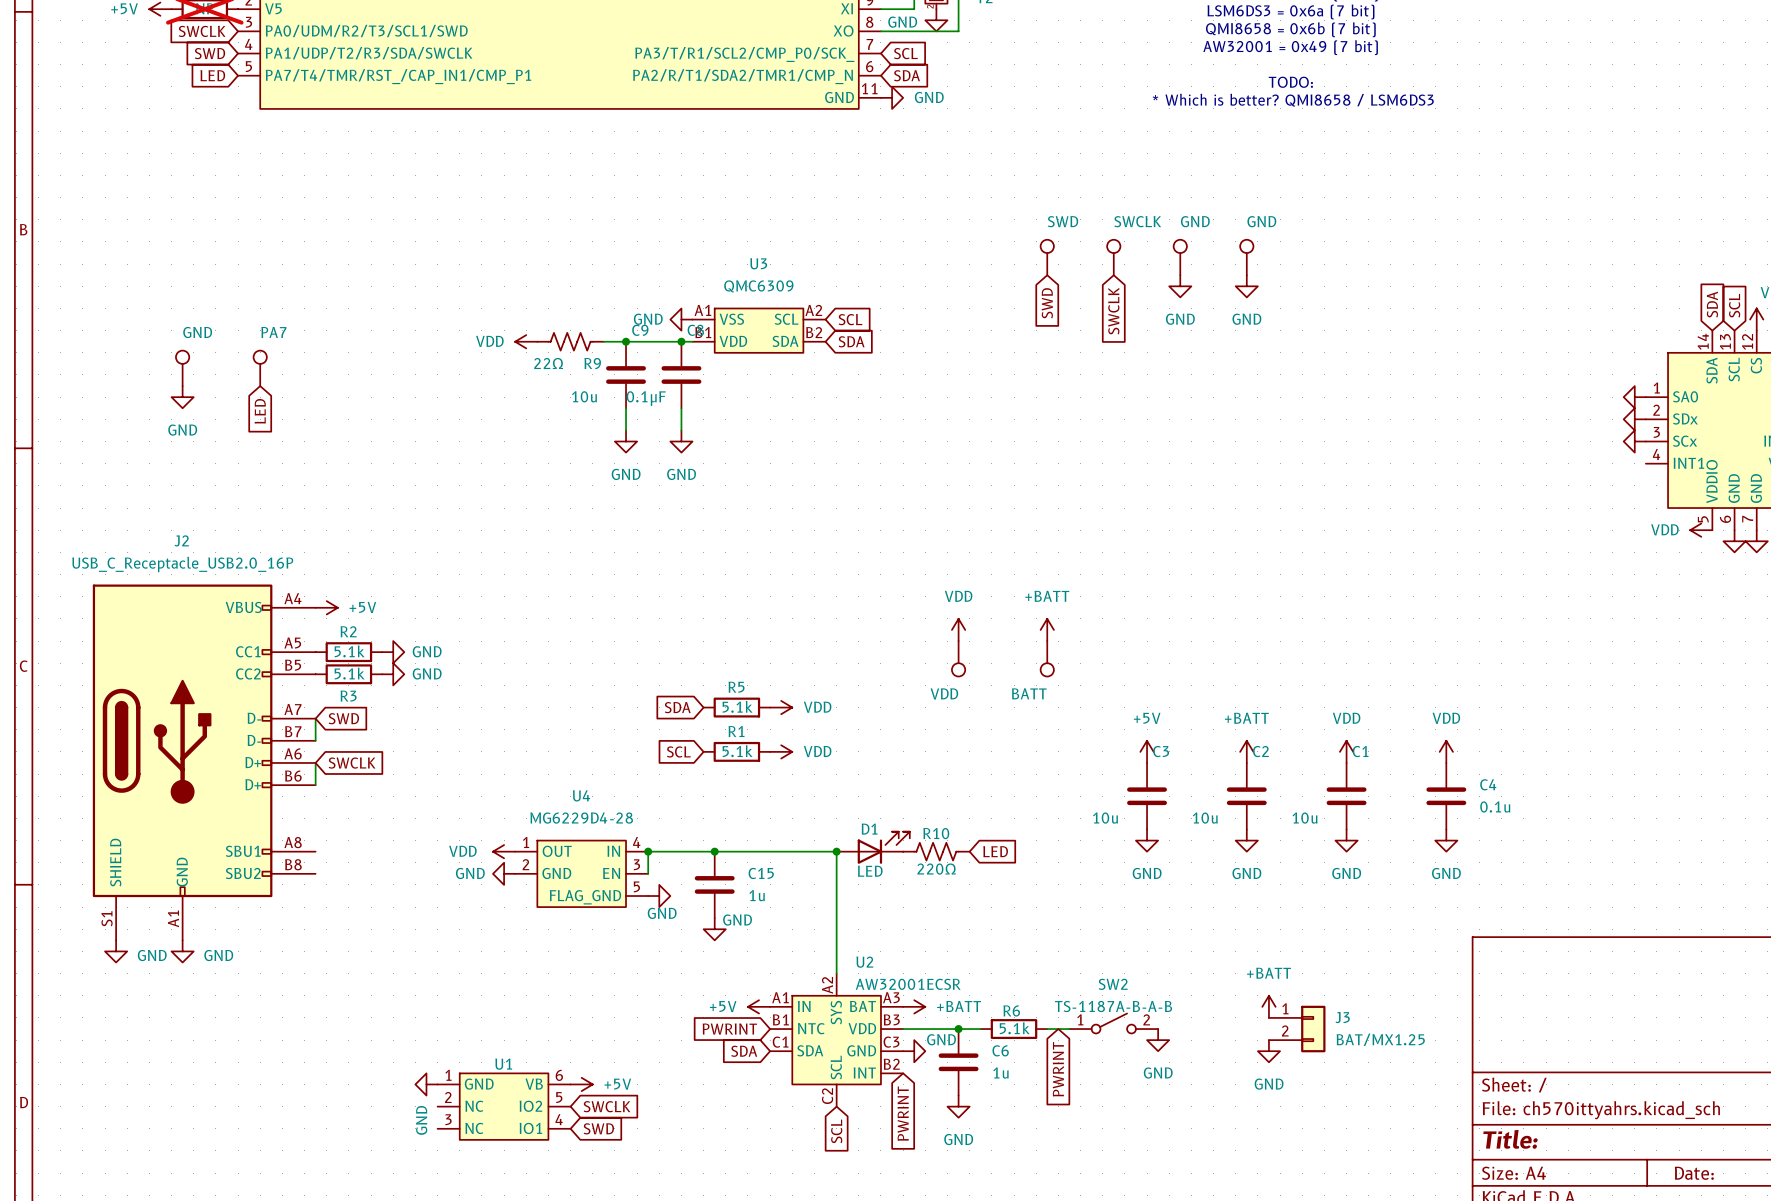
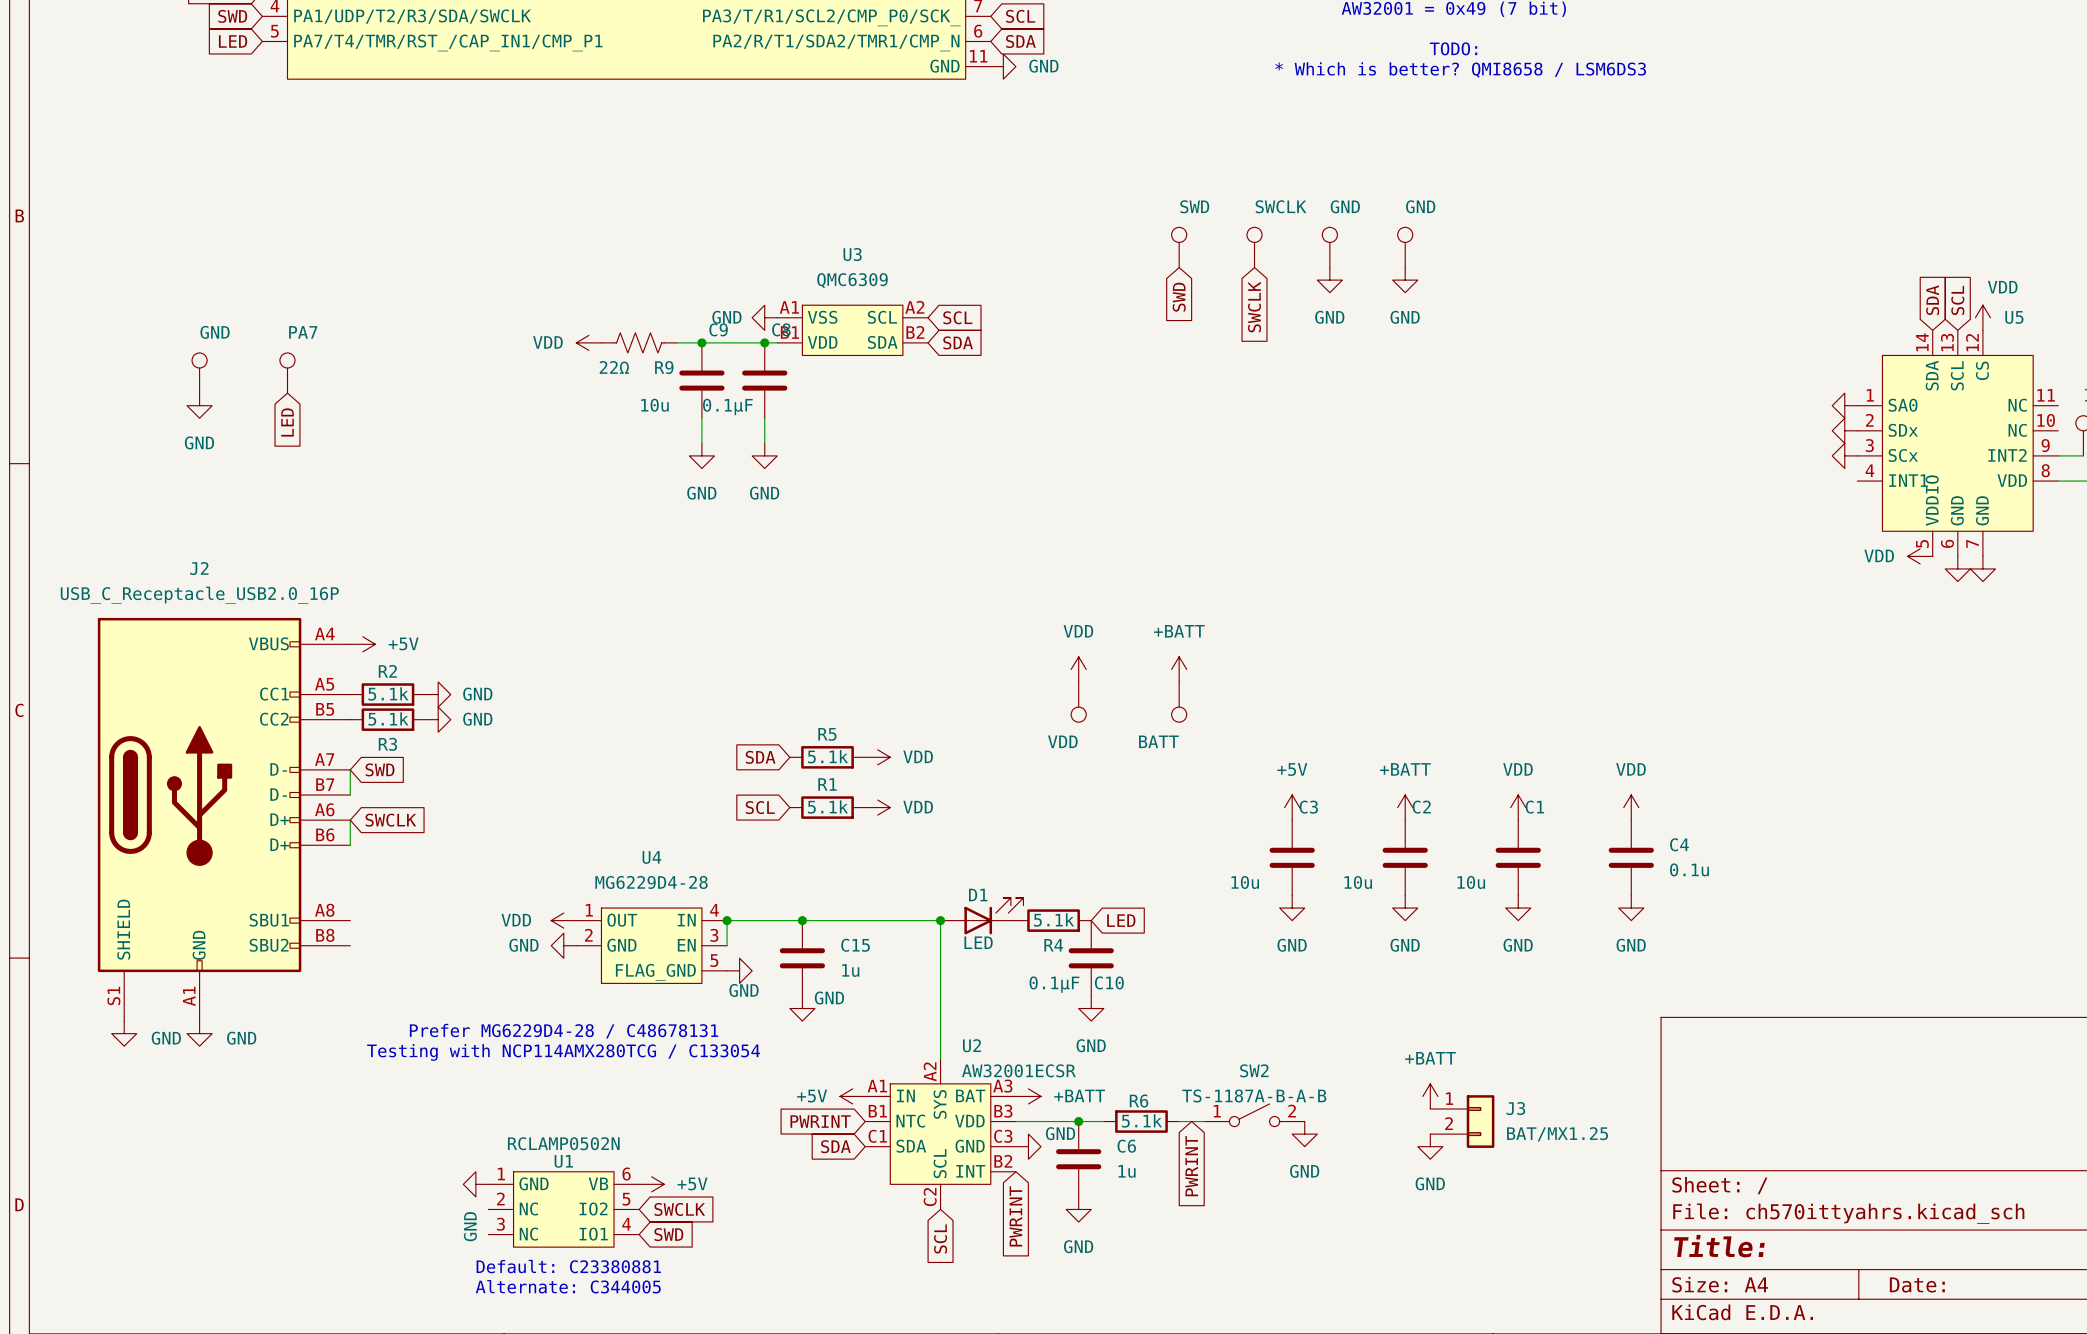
R10: 220Ω (936, 851) -> none
R4: none -> 5.1k (1053, 920)
C10: none -> 0.1μF (1091, 958)
power symbol: none -> GND (1091, 1008)
text: none -> Prefer MG6229D4-28 / C48678131 (564, 1031)
text: none -> Testing with NCP114AMX280TCG / C133054 (563, 1052)
U1 value: none -> RCLAMP0502N (563, 1143)
text: none -> Default: C23380881 (568, 1266)
text: none -> Alternate: C344005 (568, 1286)

